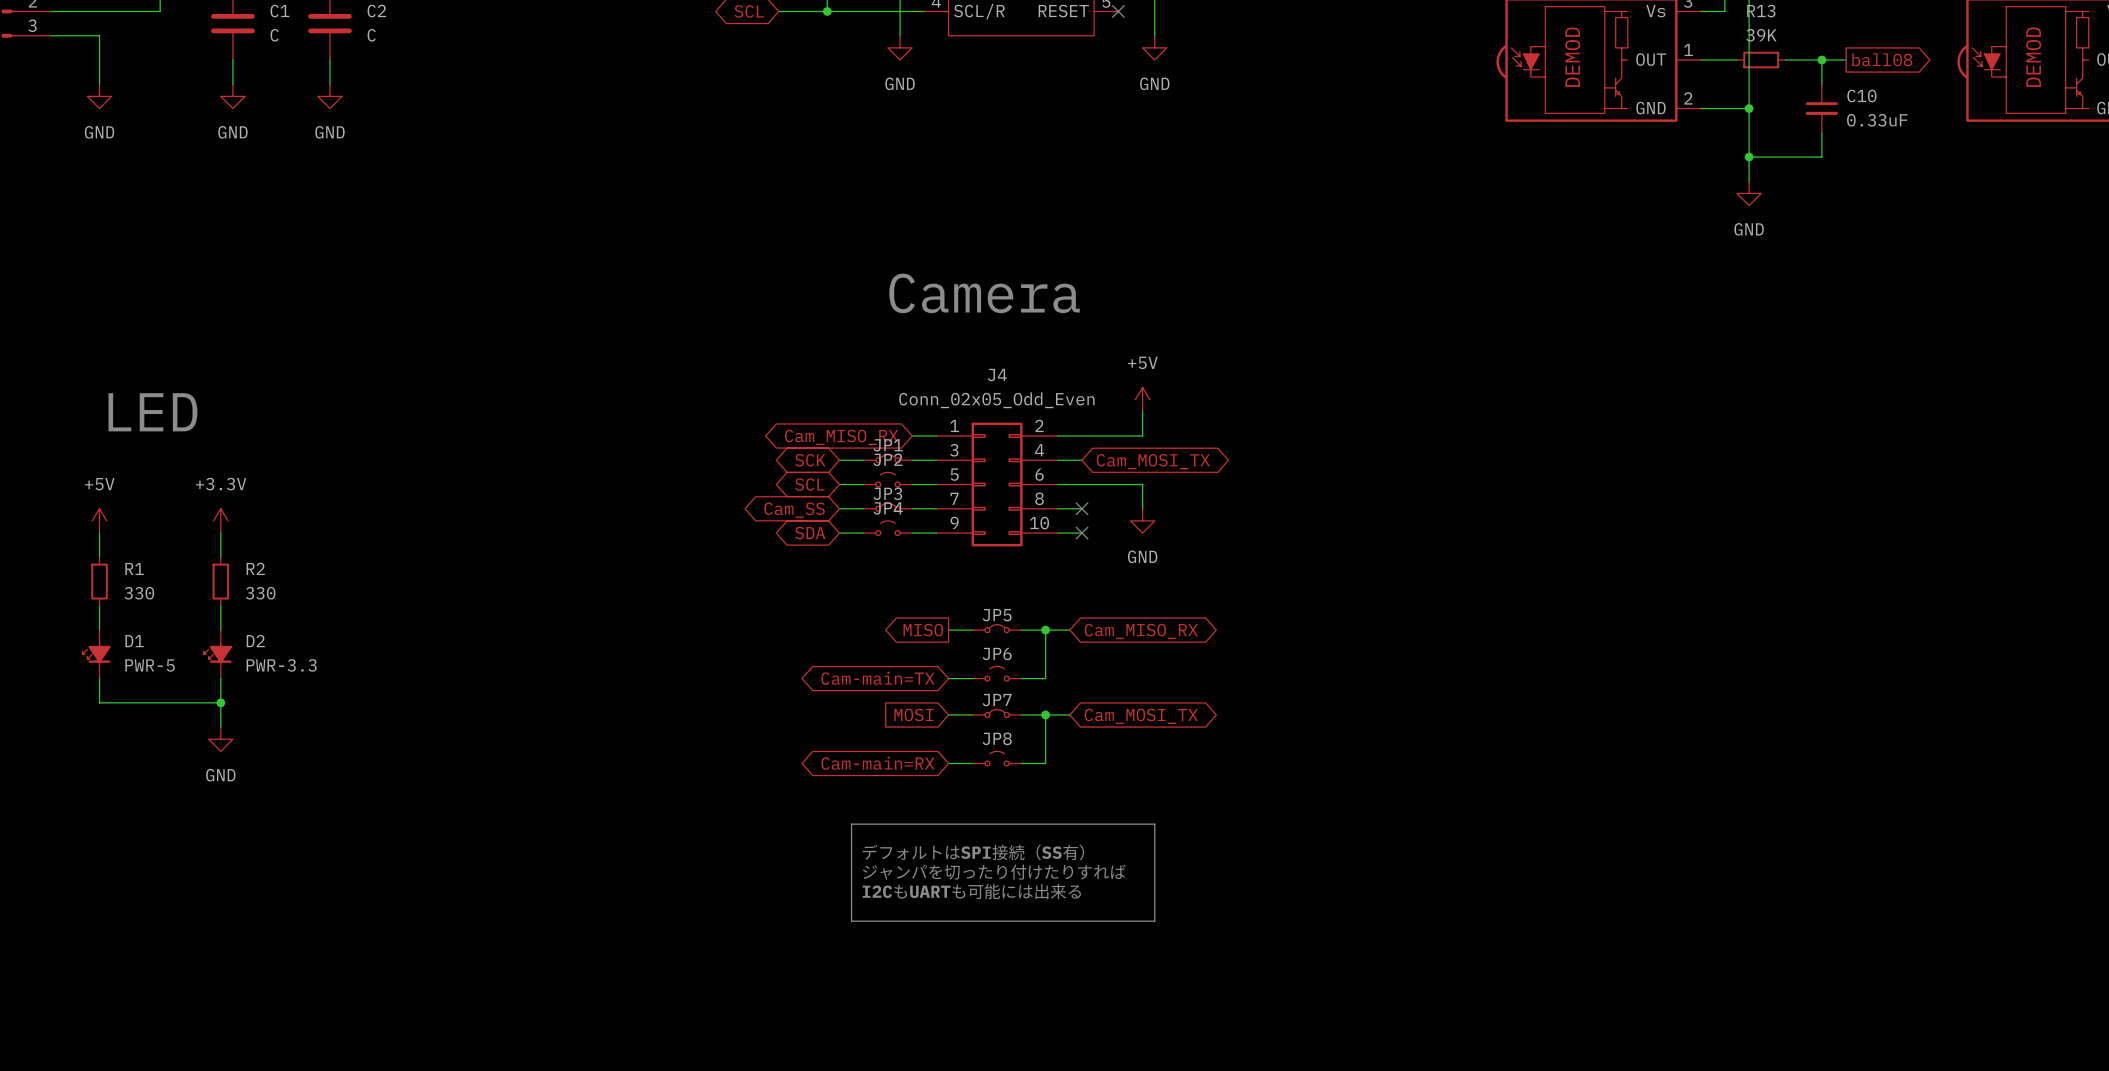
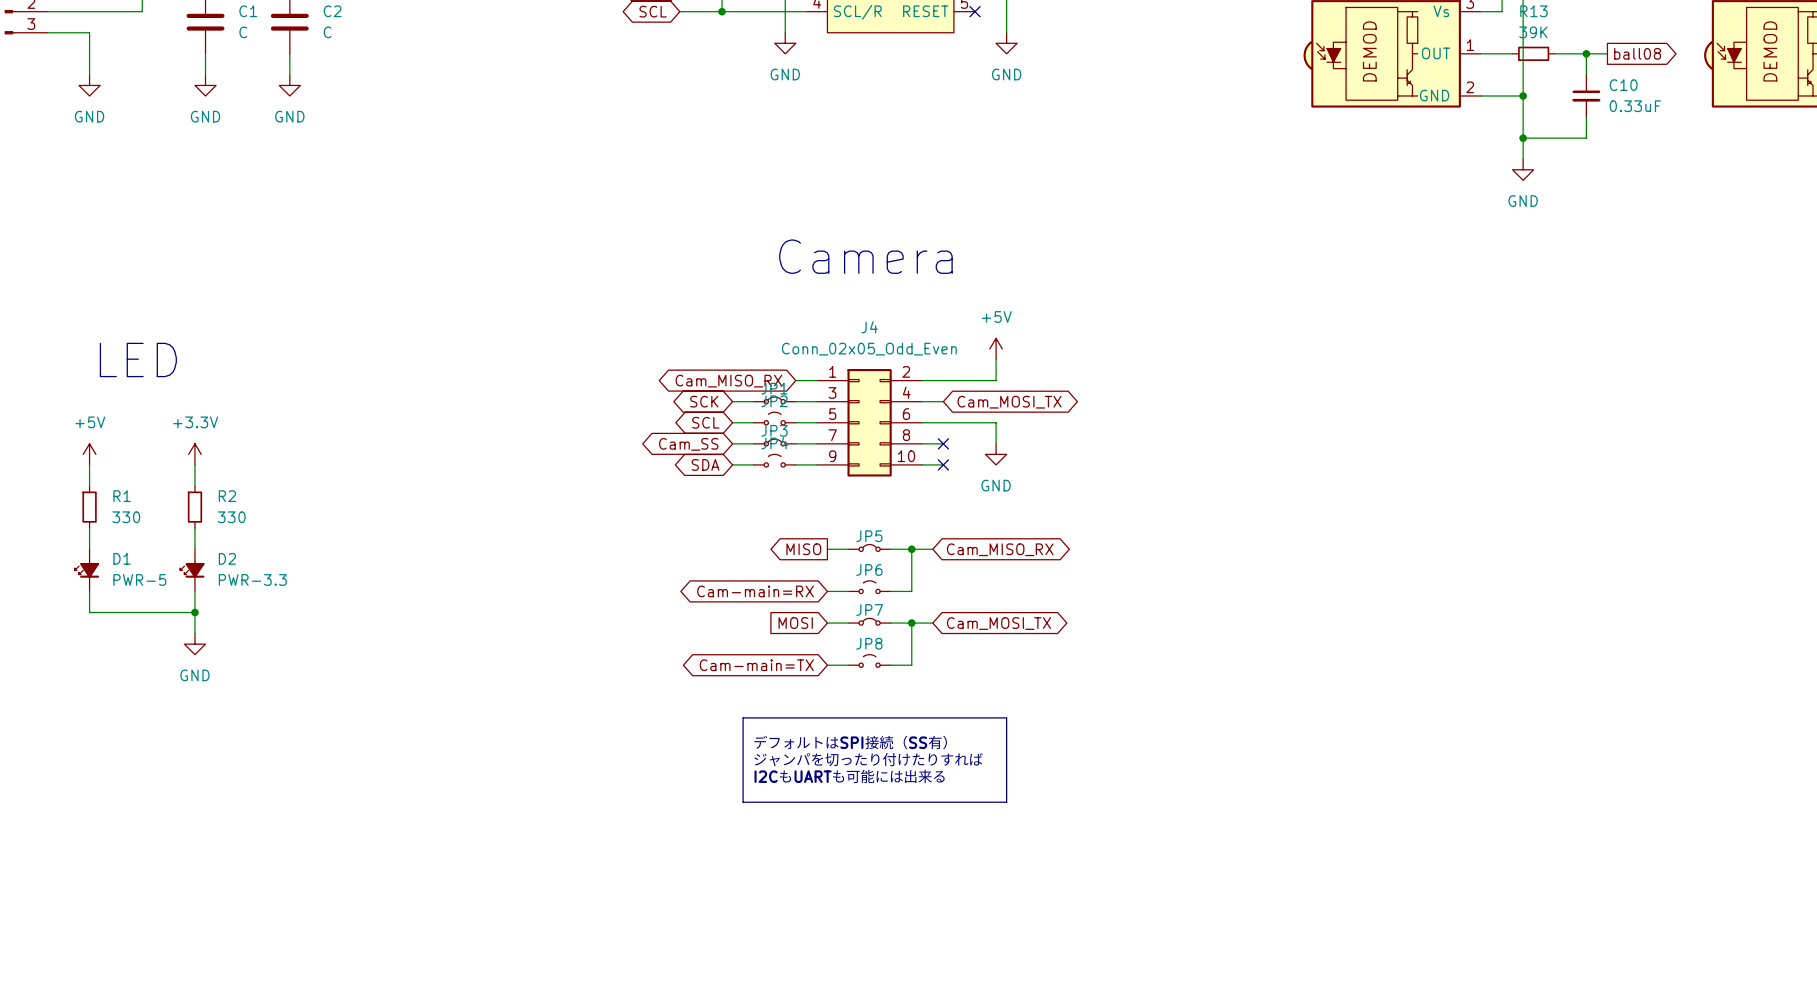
global label: Cam-main=TX (877, 678) -> Cam-main=RX (755, 591)
global label: Cam-main=RX (877, 763) -> Cam-main=TX (756, 665)

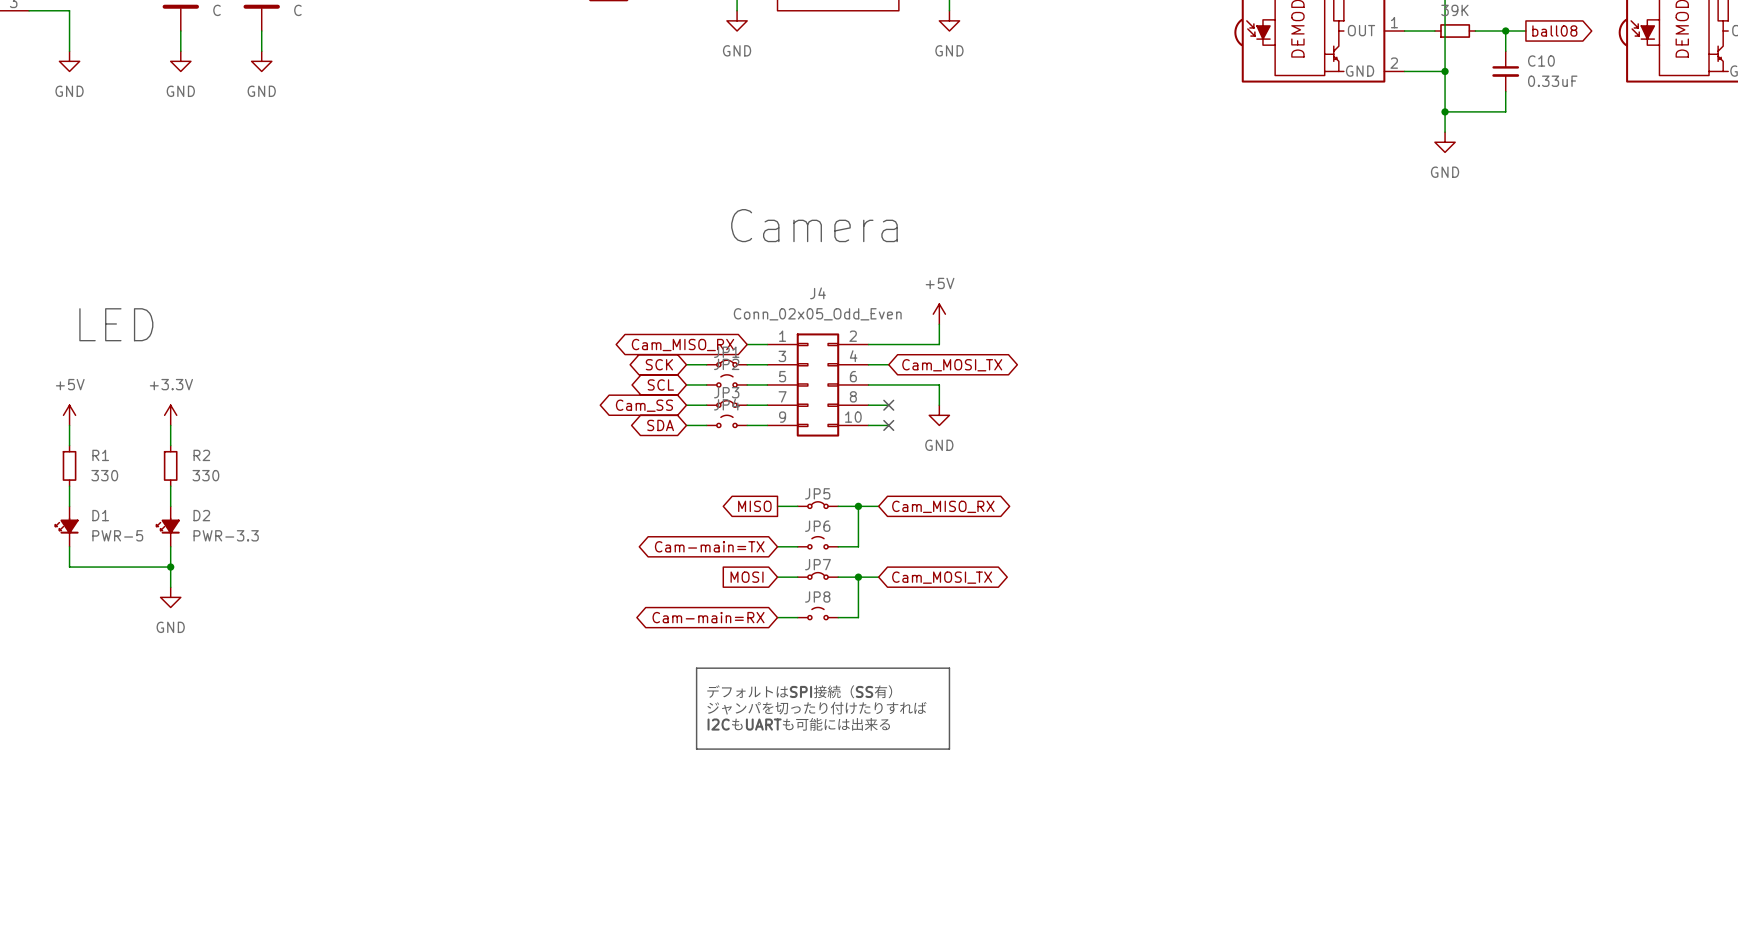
global label: Cam-main=RX (755, 591) -> Cam-main=TX (709, 546)
global label: Cam-main=TX (756, 665) -> Cam-main=RX (708, 617)

